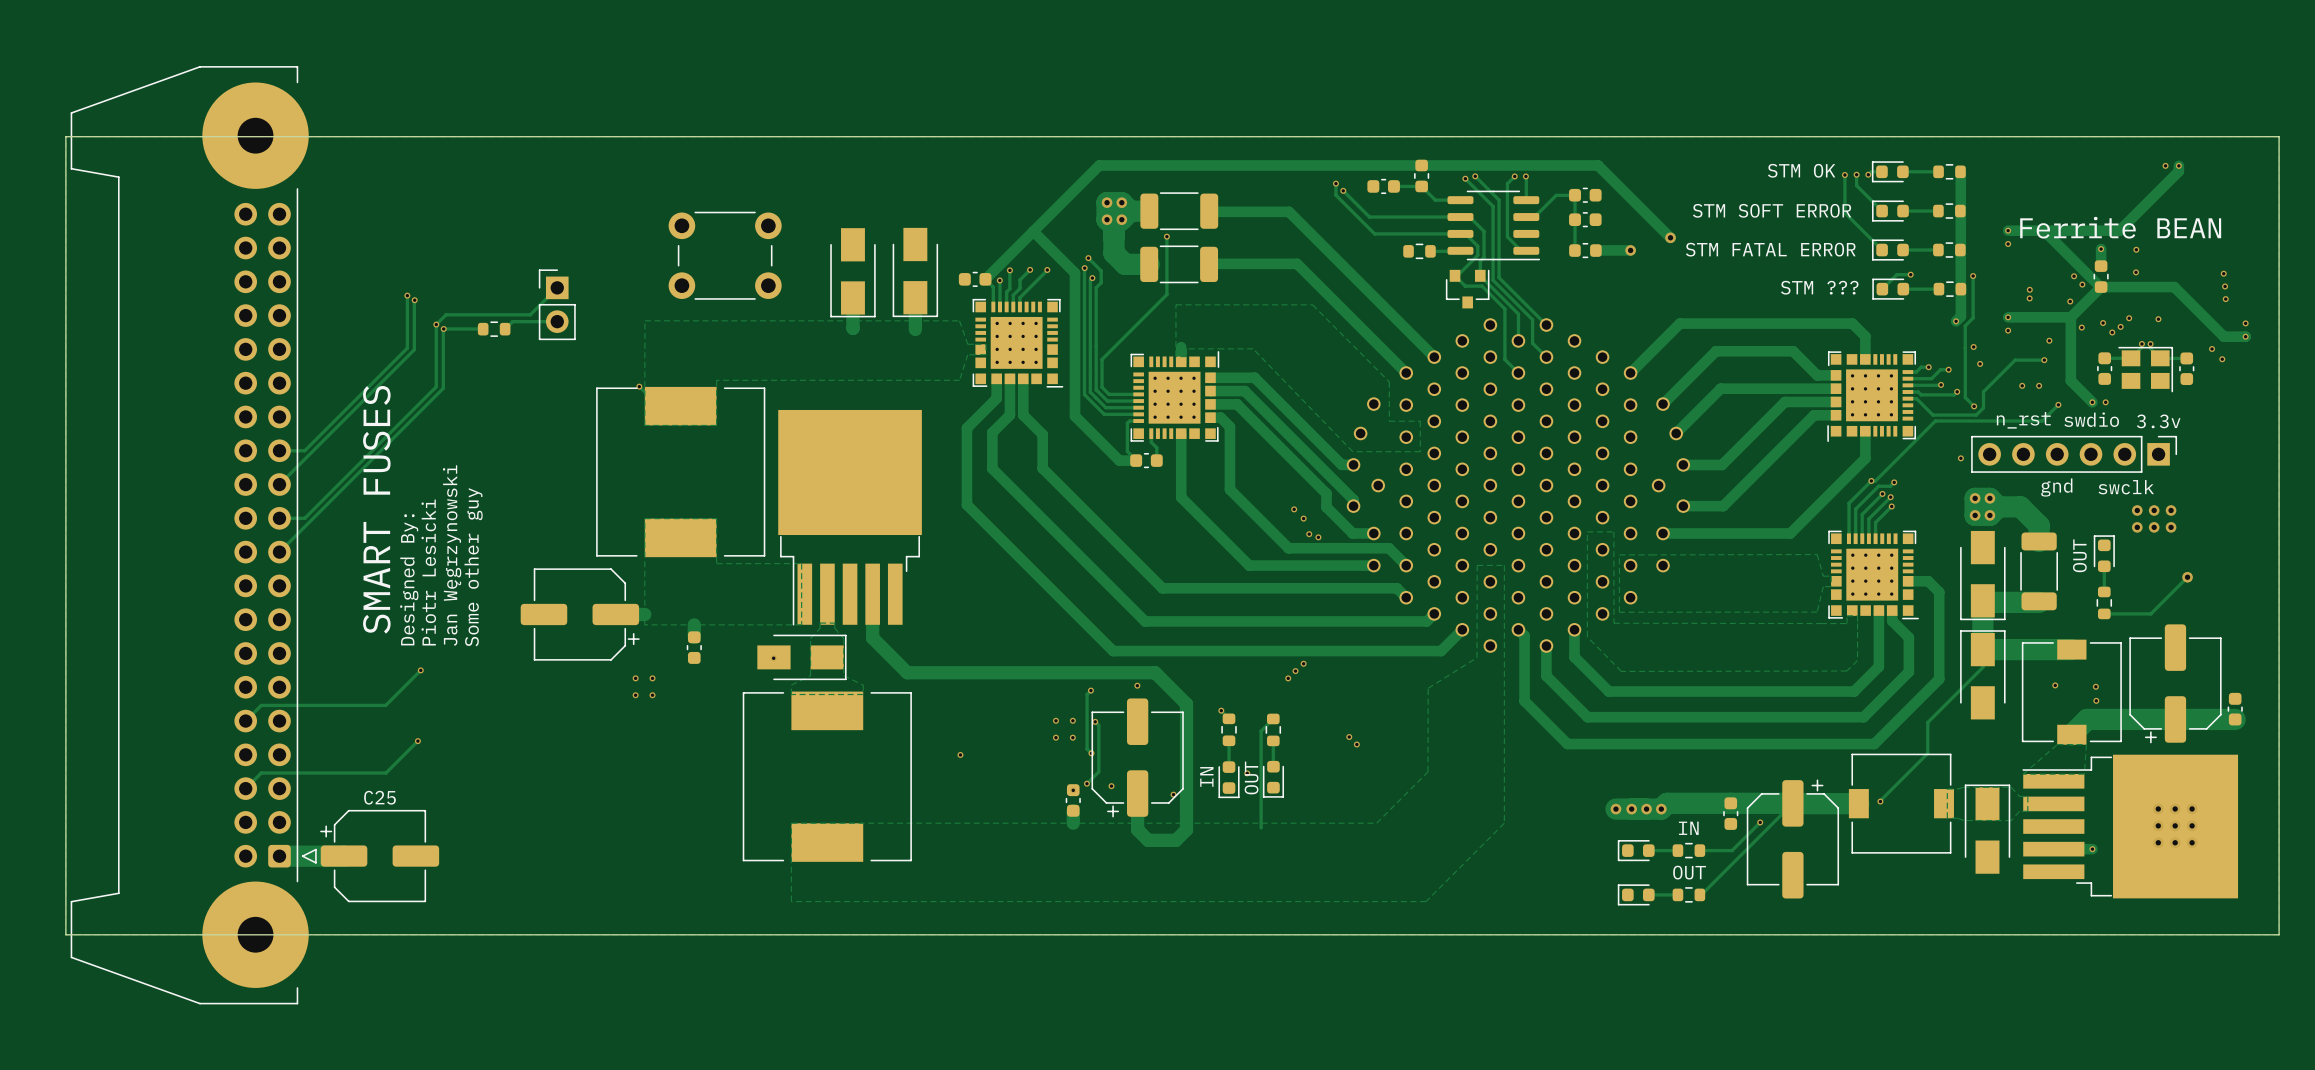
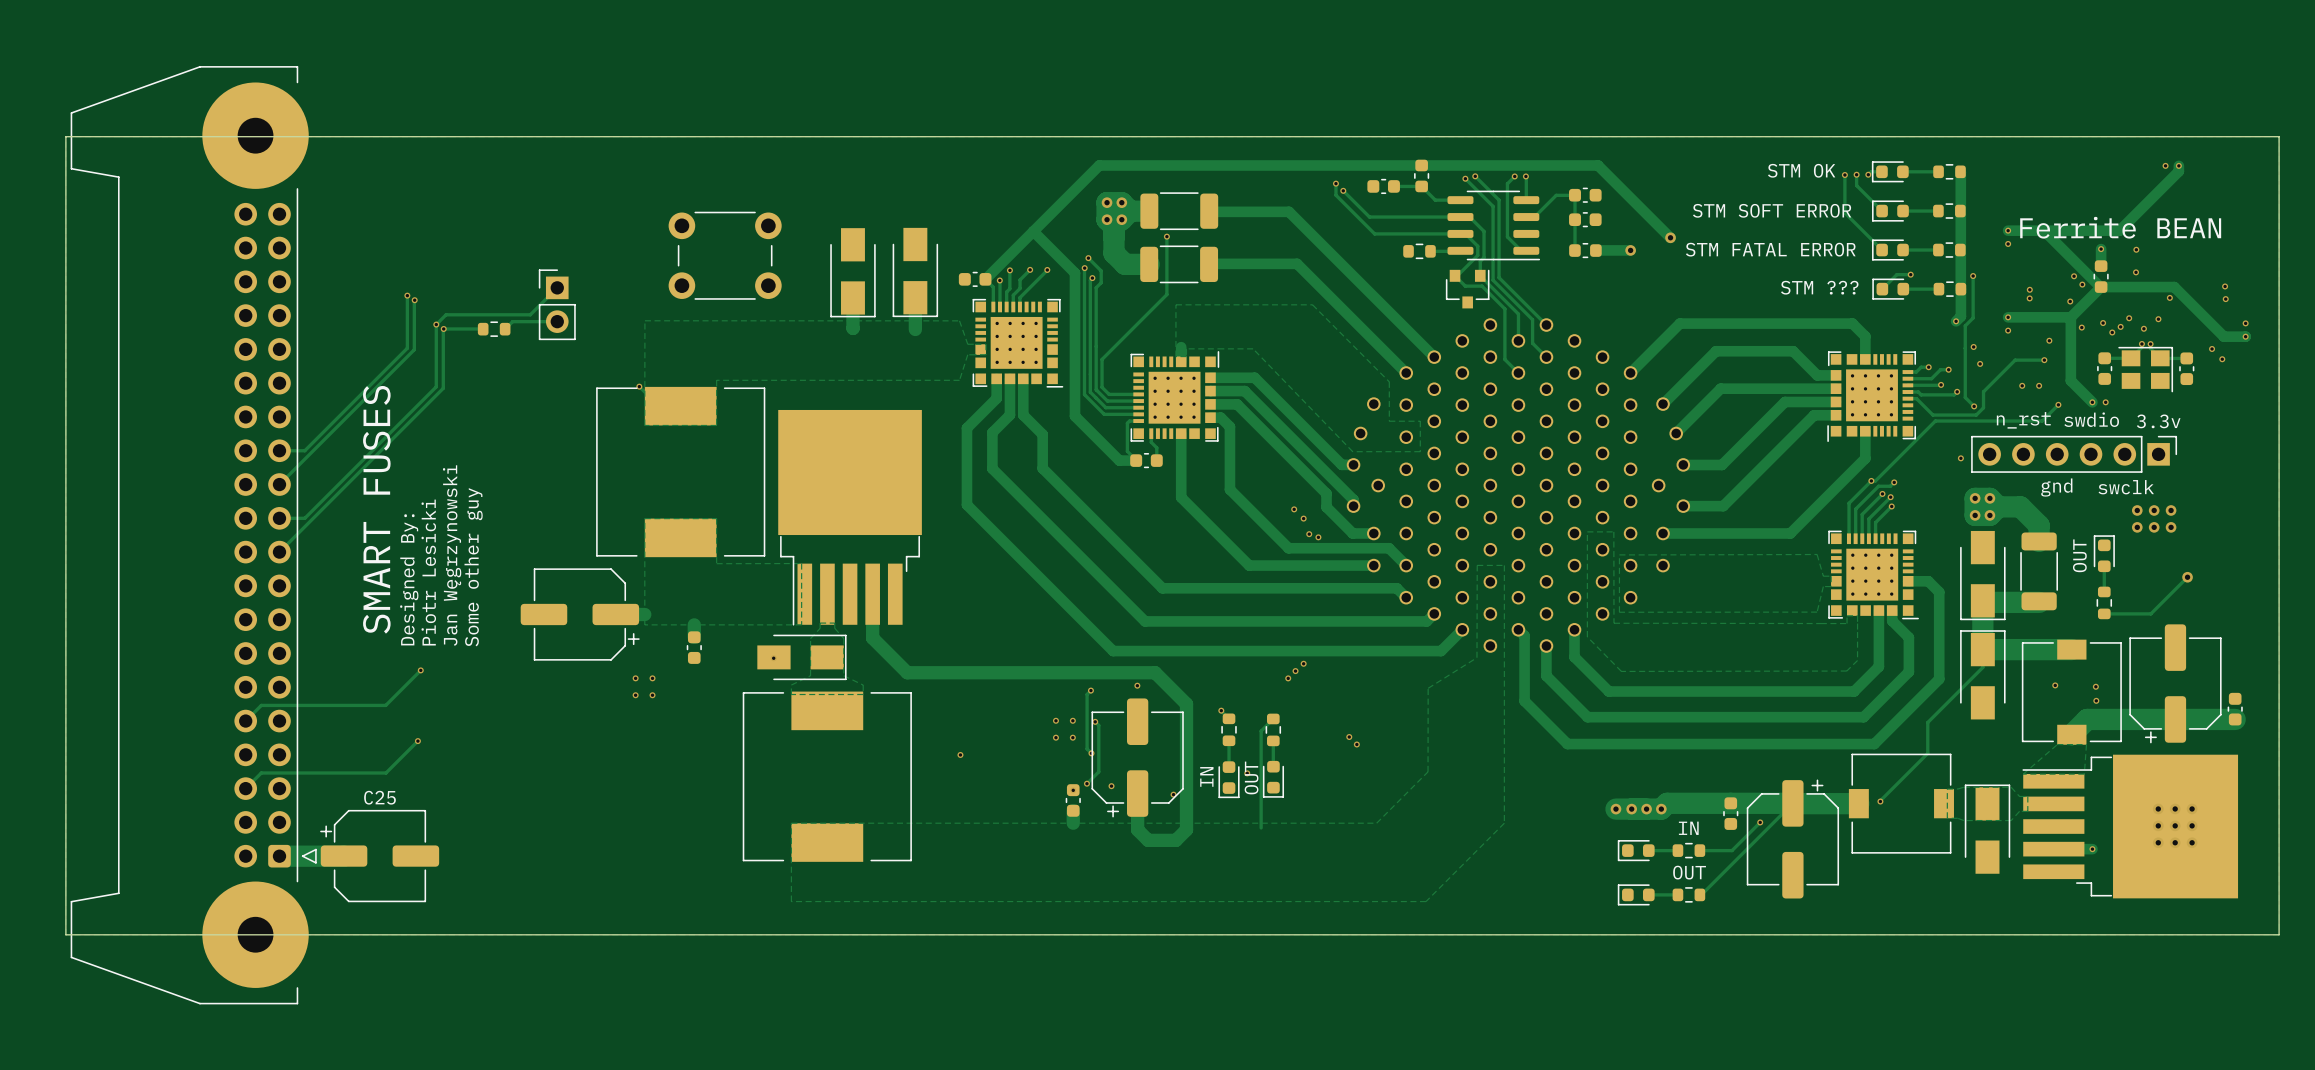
via: (2223, 273) -> none
via: none -> (2169, 297)
via: none -> (2143, 328)

